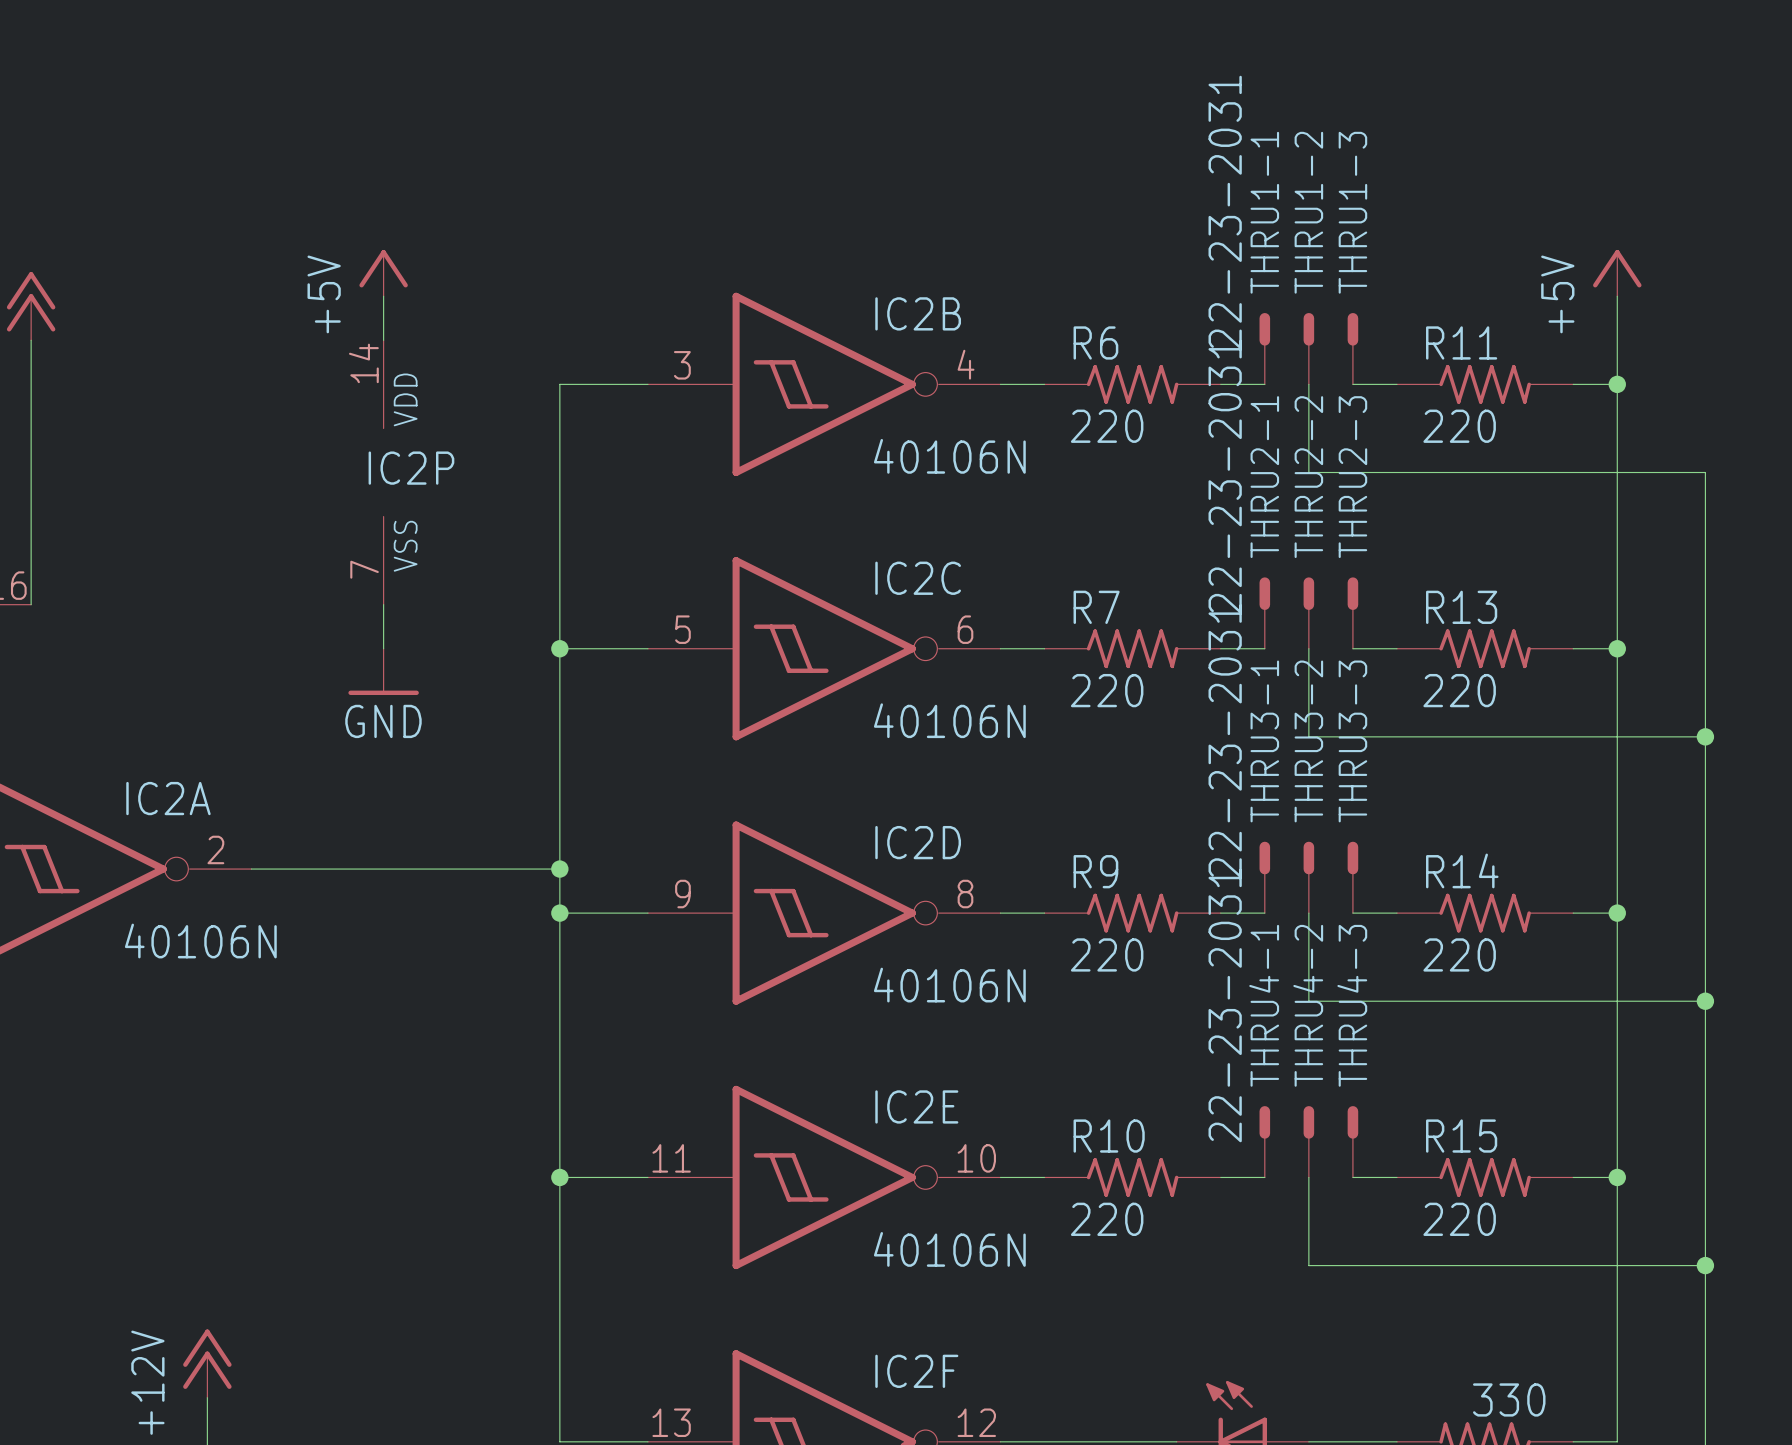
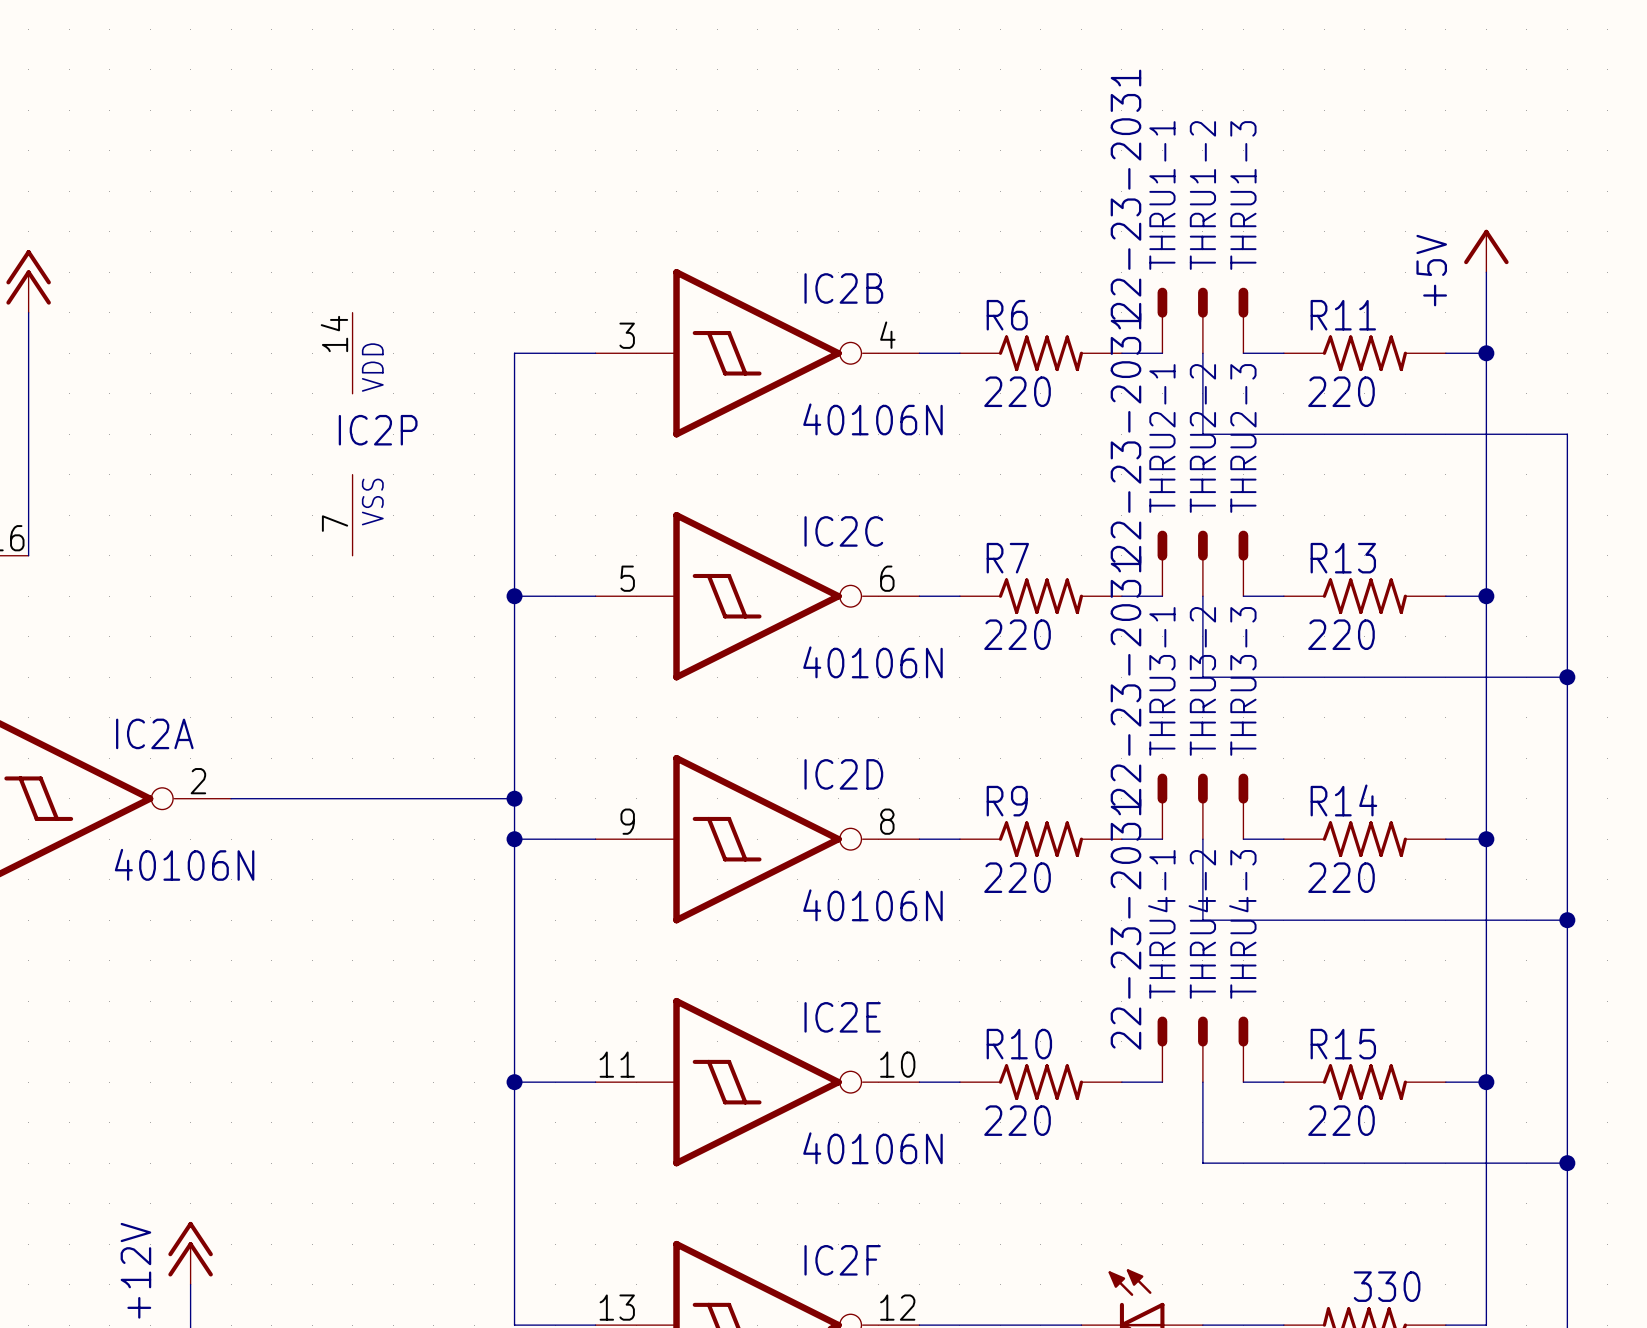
power symbol: +5V (383, 273) -> none
wire: (383, 296) (383, 340) -> none
wire: (383, 604) (383, 648) -> none
power symbol: GND (383, 671) -> none

